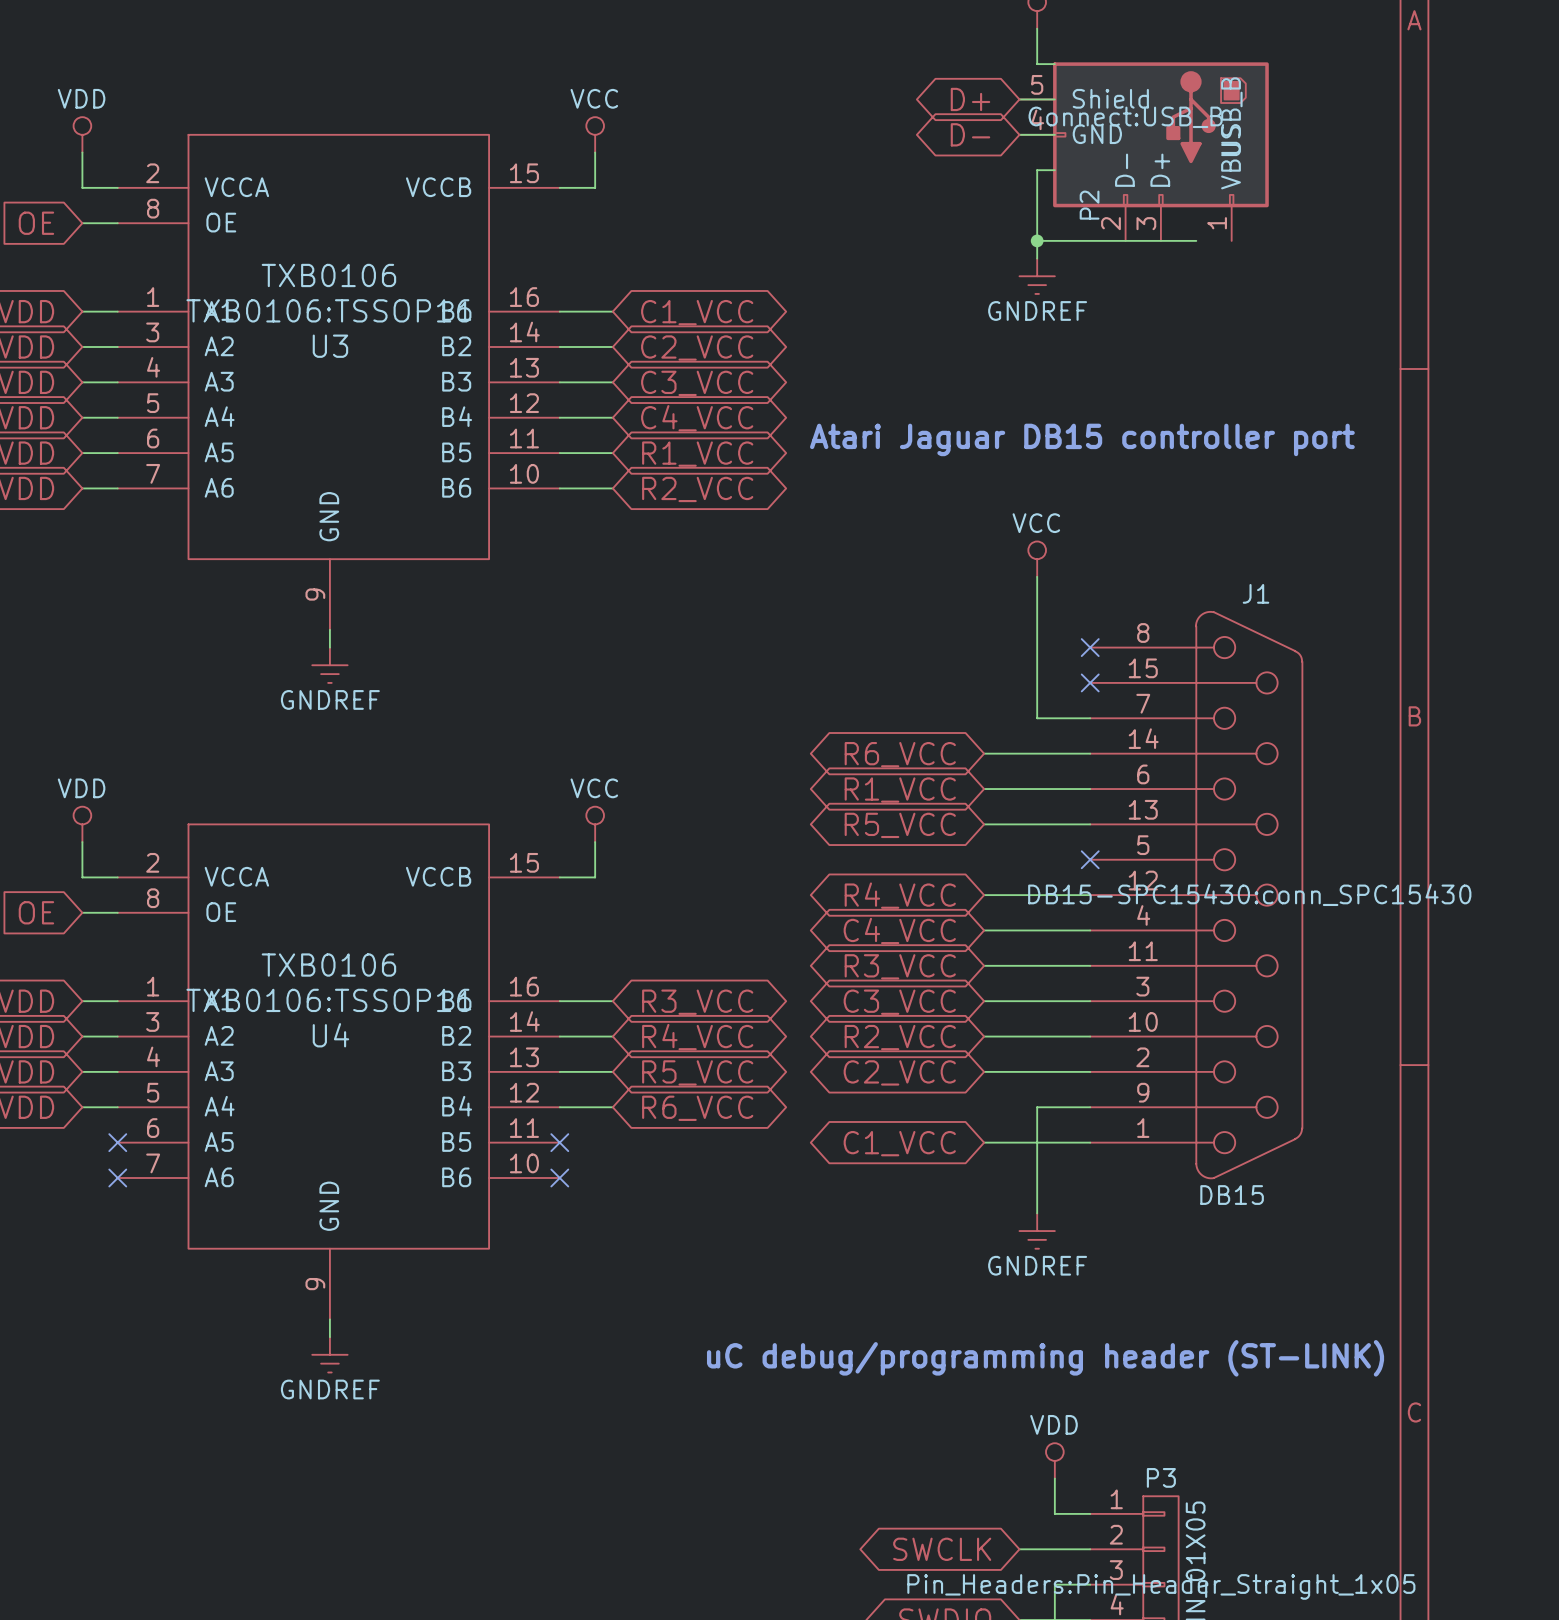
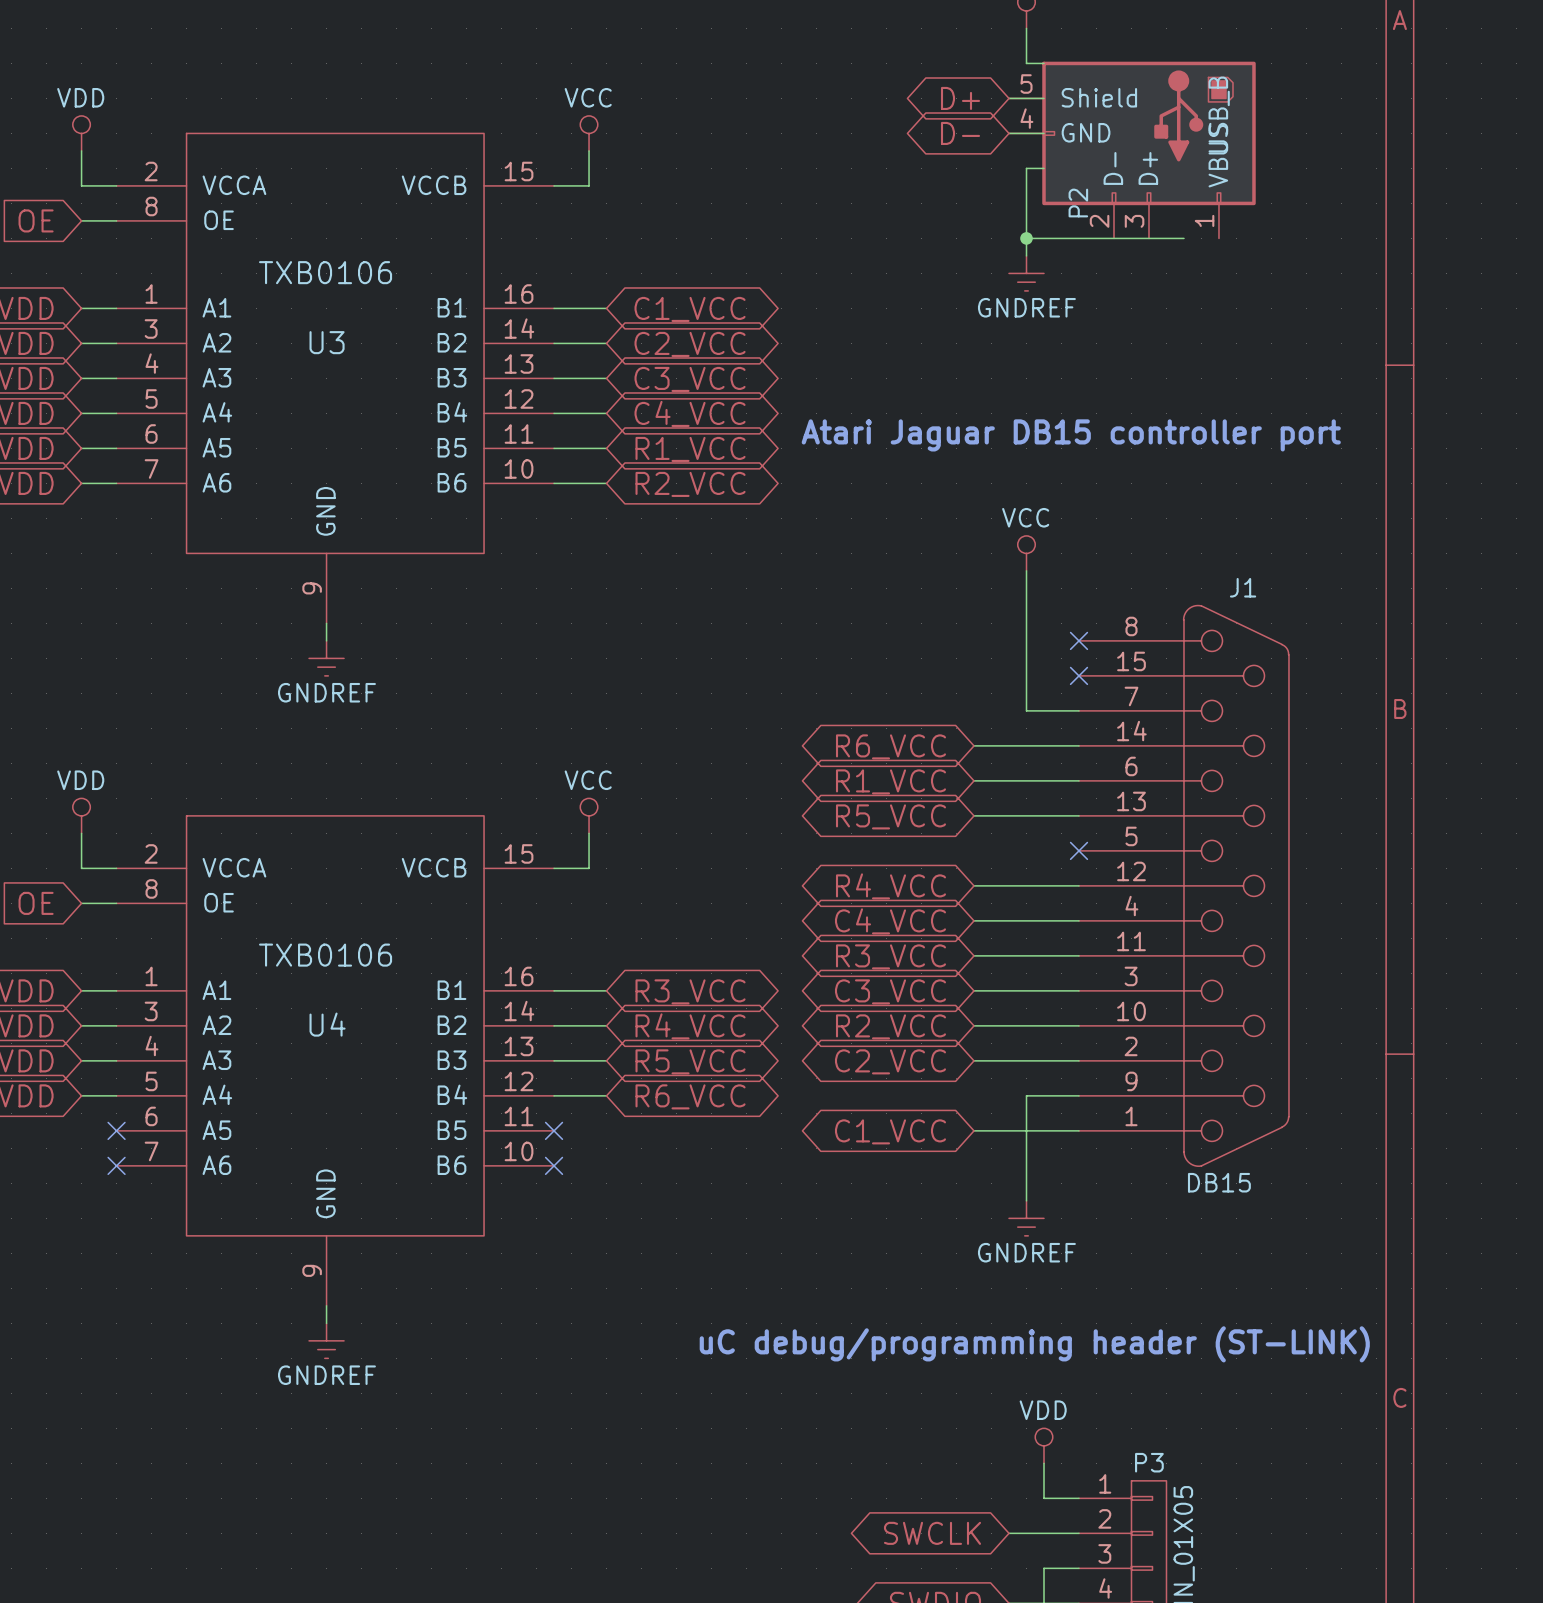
P2 text: Connect:USB_B (1125, 117) -> none
U3 text: TXB0106:TSSOP16 (328, 310) -> none
J1 text: DB15-SPC15430:conn_SPC15430 (1249, 894) -> none
U4 text: TXB0106:TSSOP16 (328, 1000) -> none
P3 text: Pin_Headers:Pin_Header_Straight_1x05 (1161, 1586) -> none

